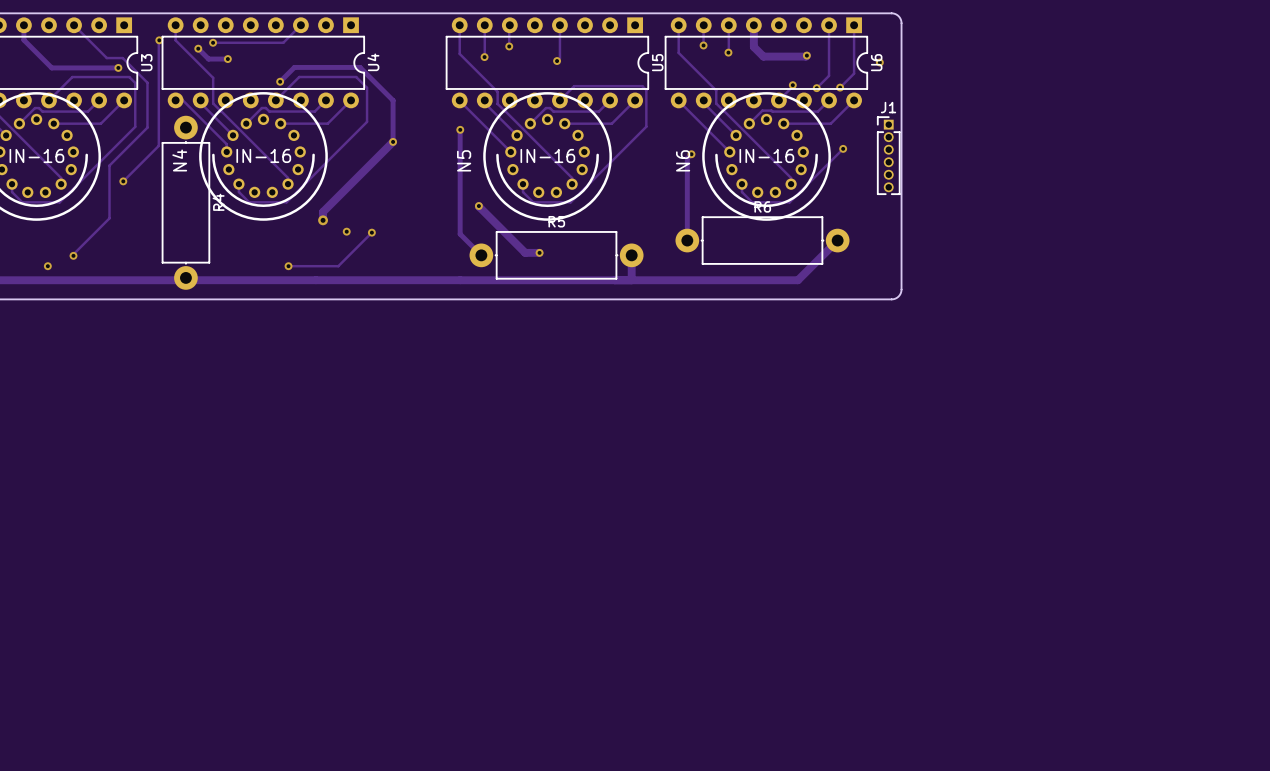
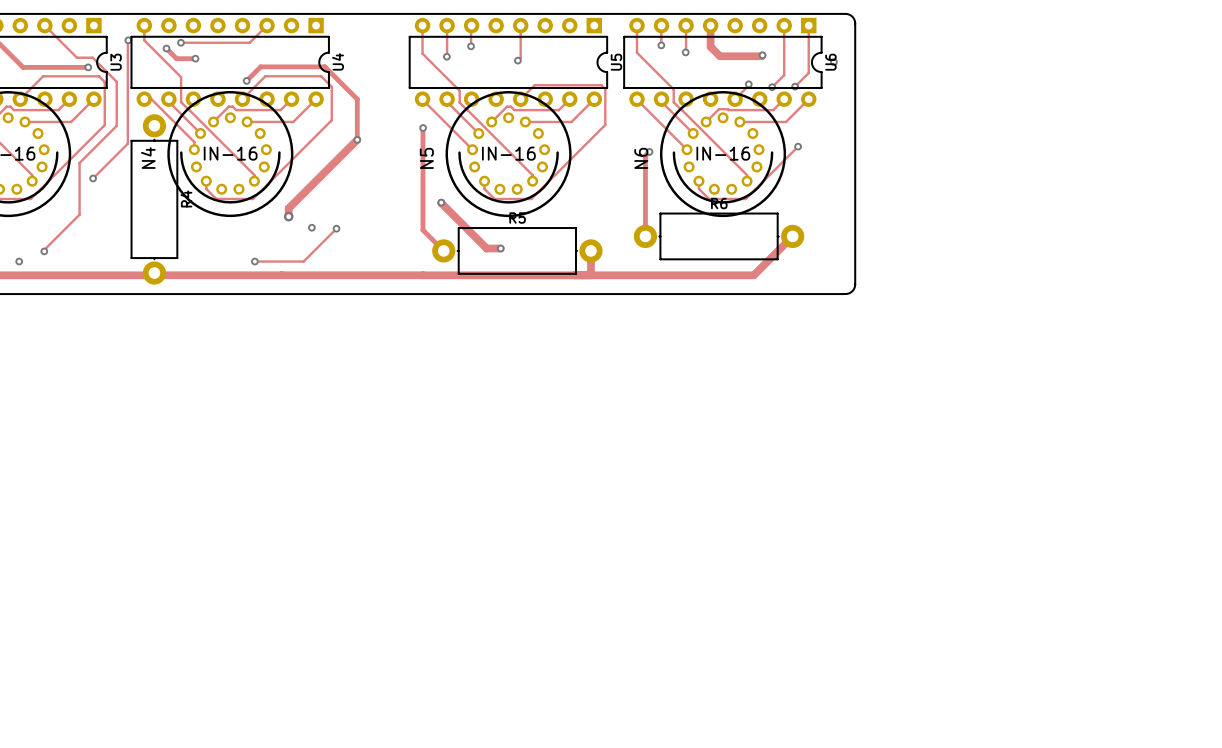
J1: (888, 155) -> none

